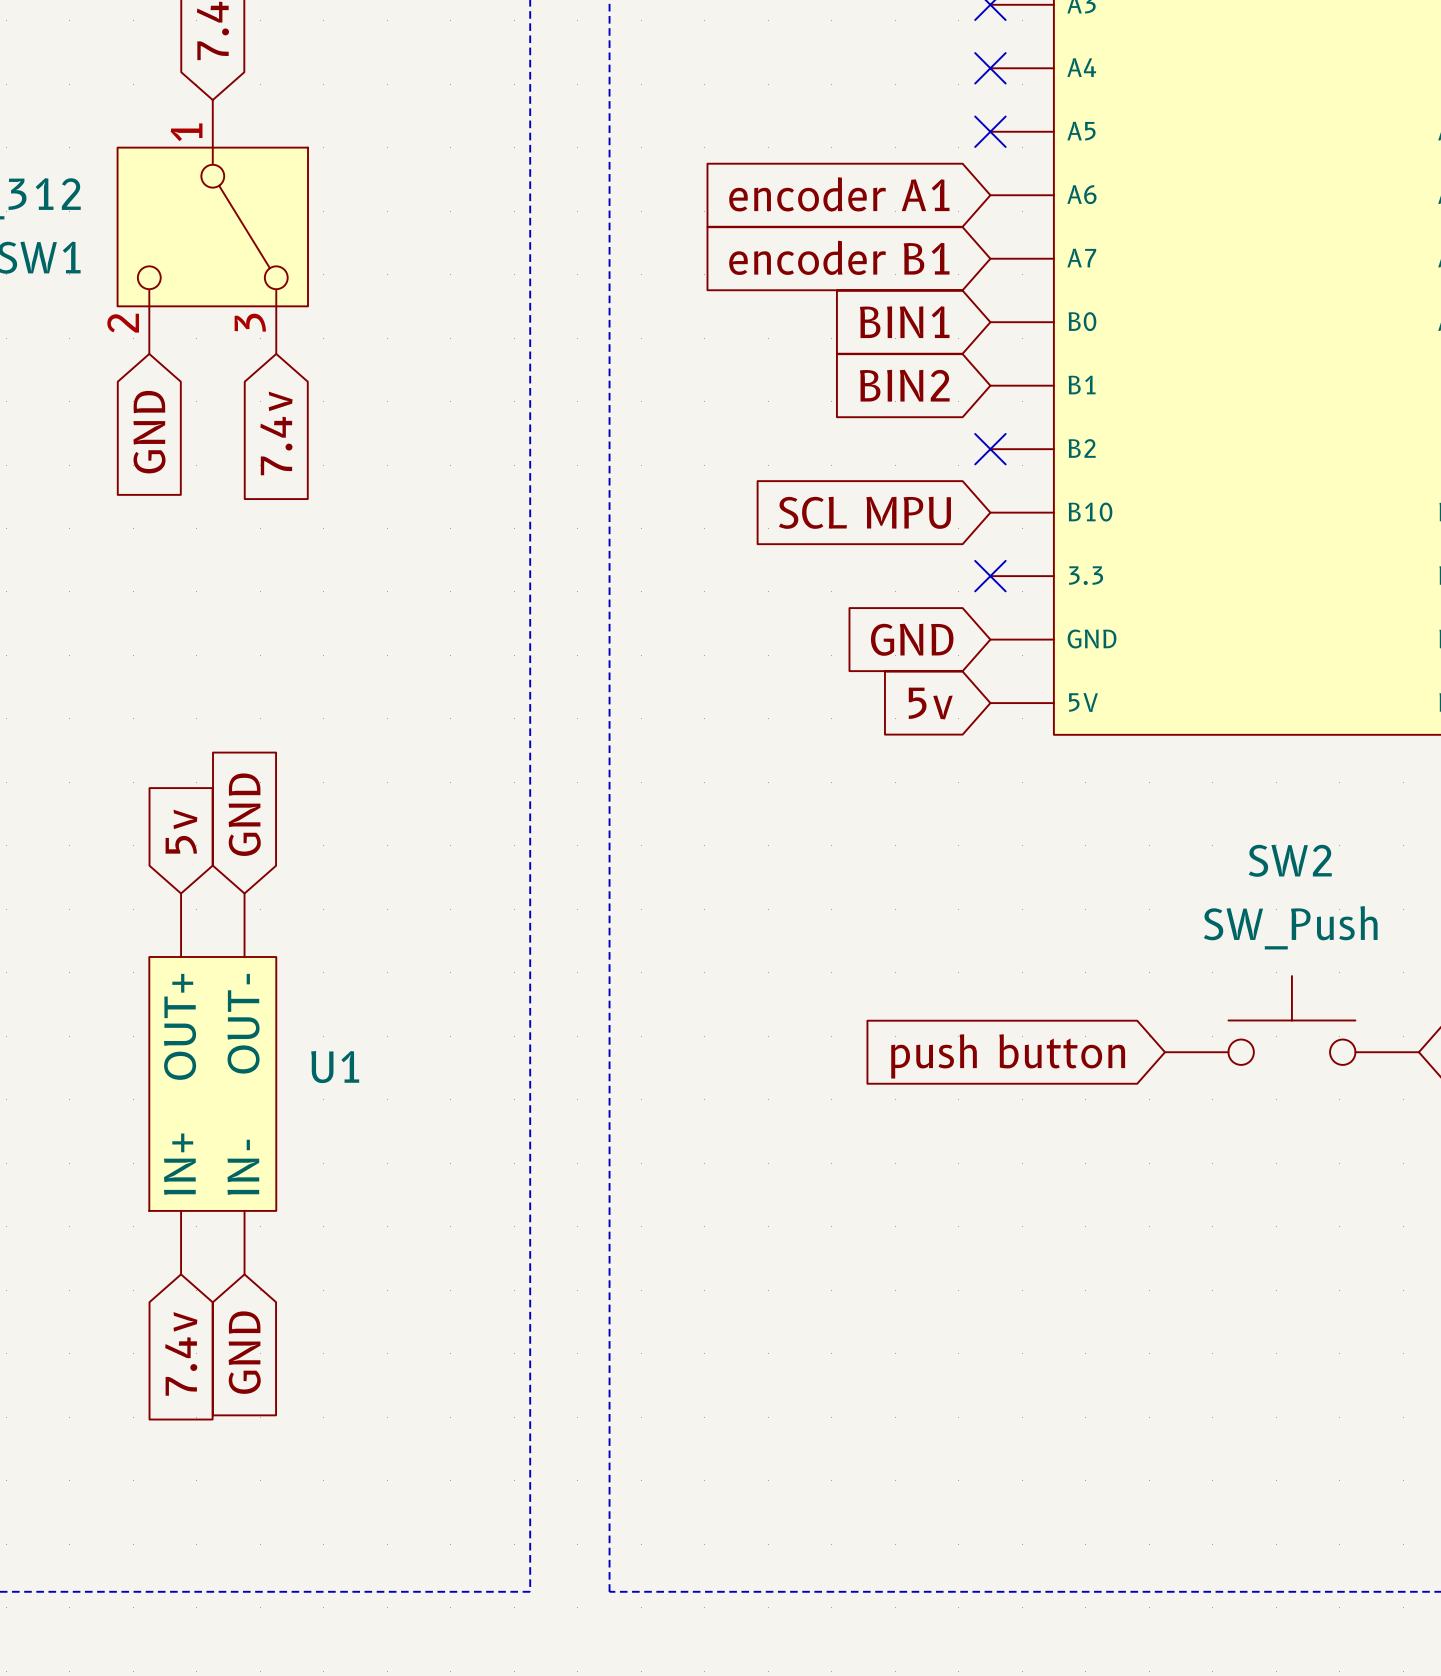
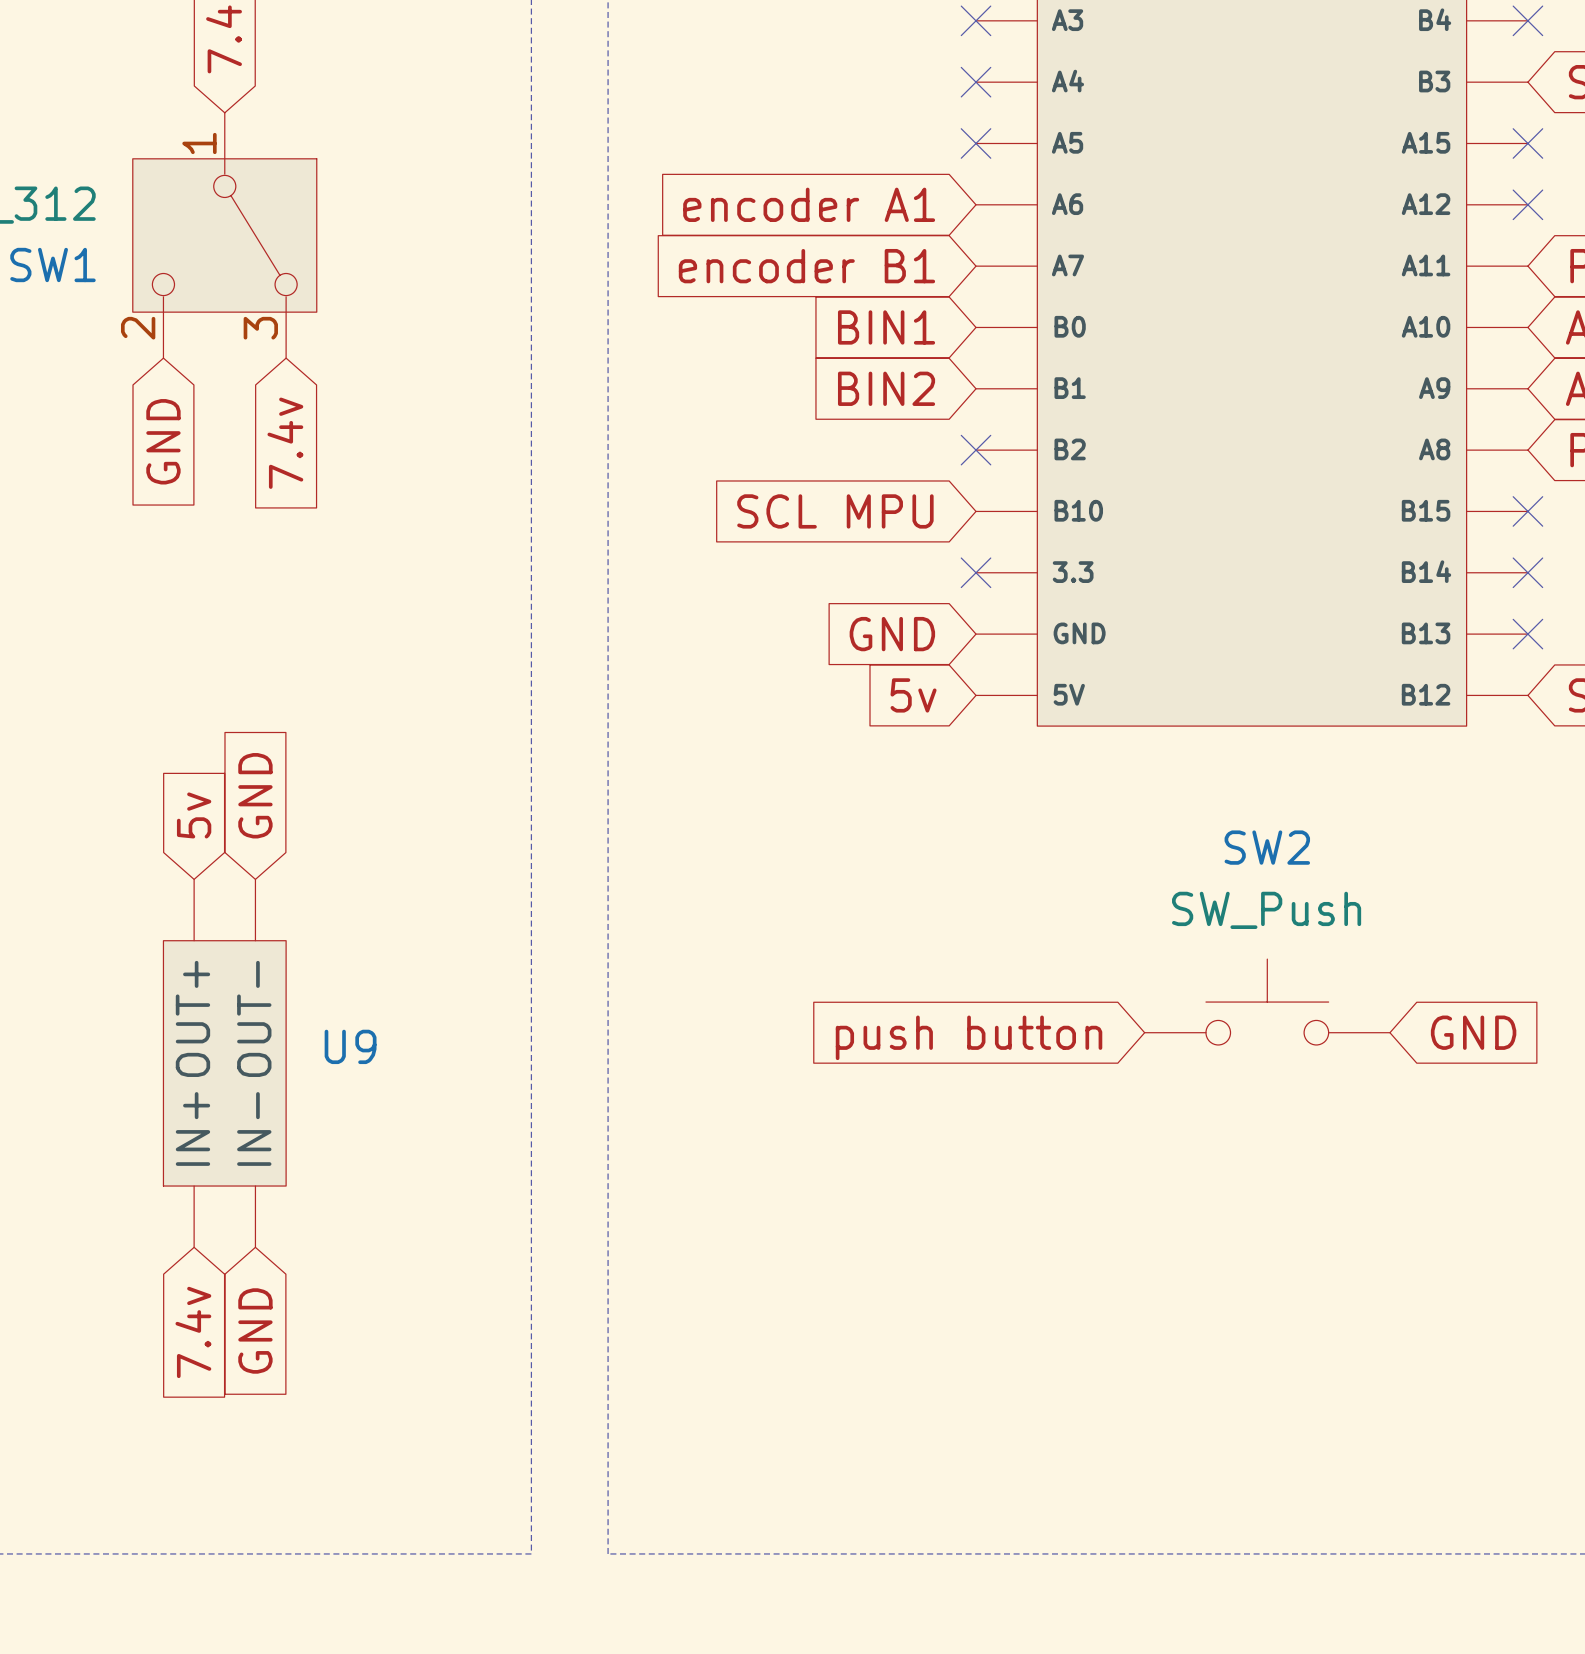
U1 name: U1 (335, 1067) -> U9 (350, 1046)

